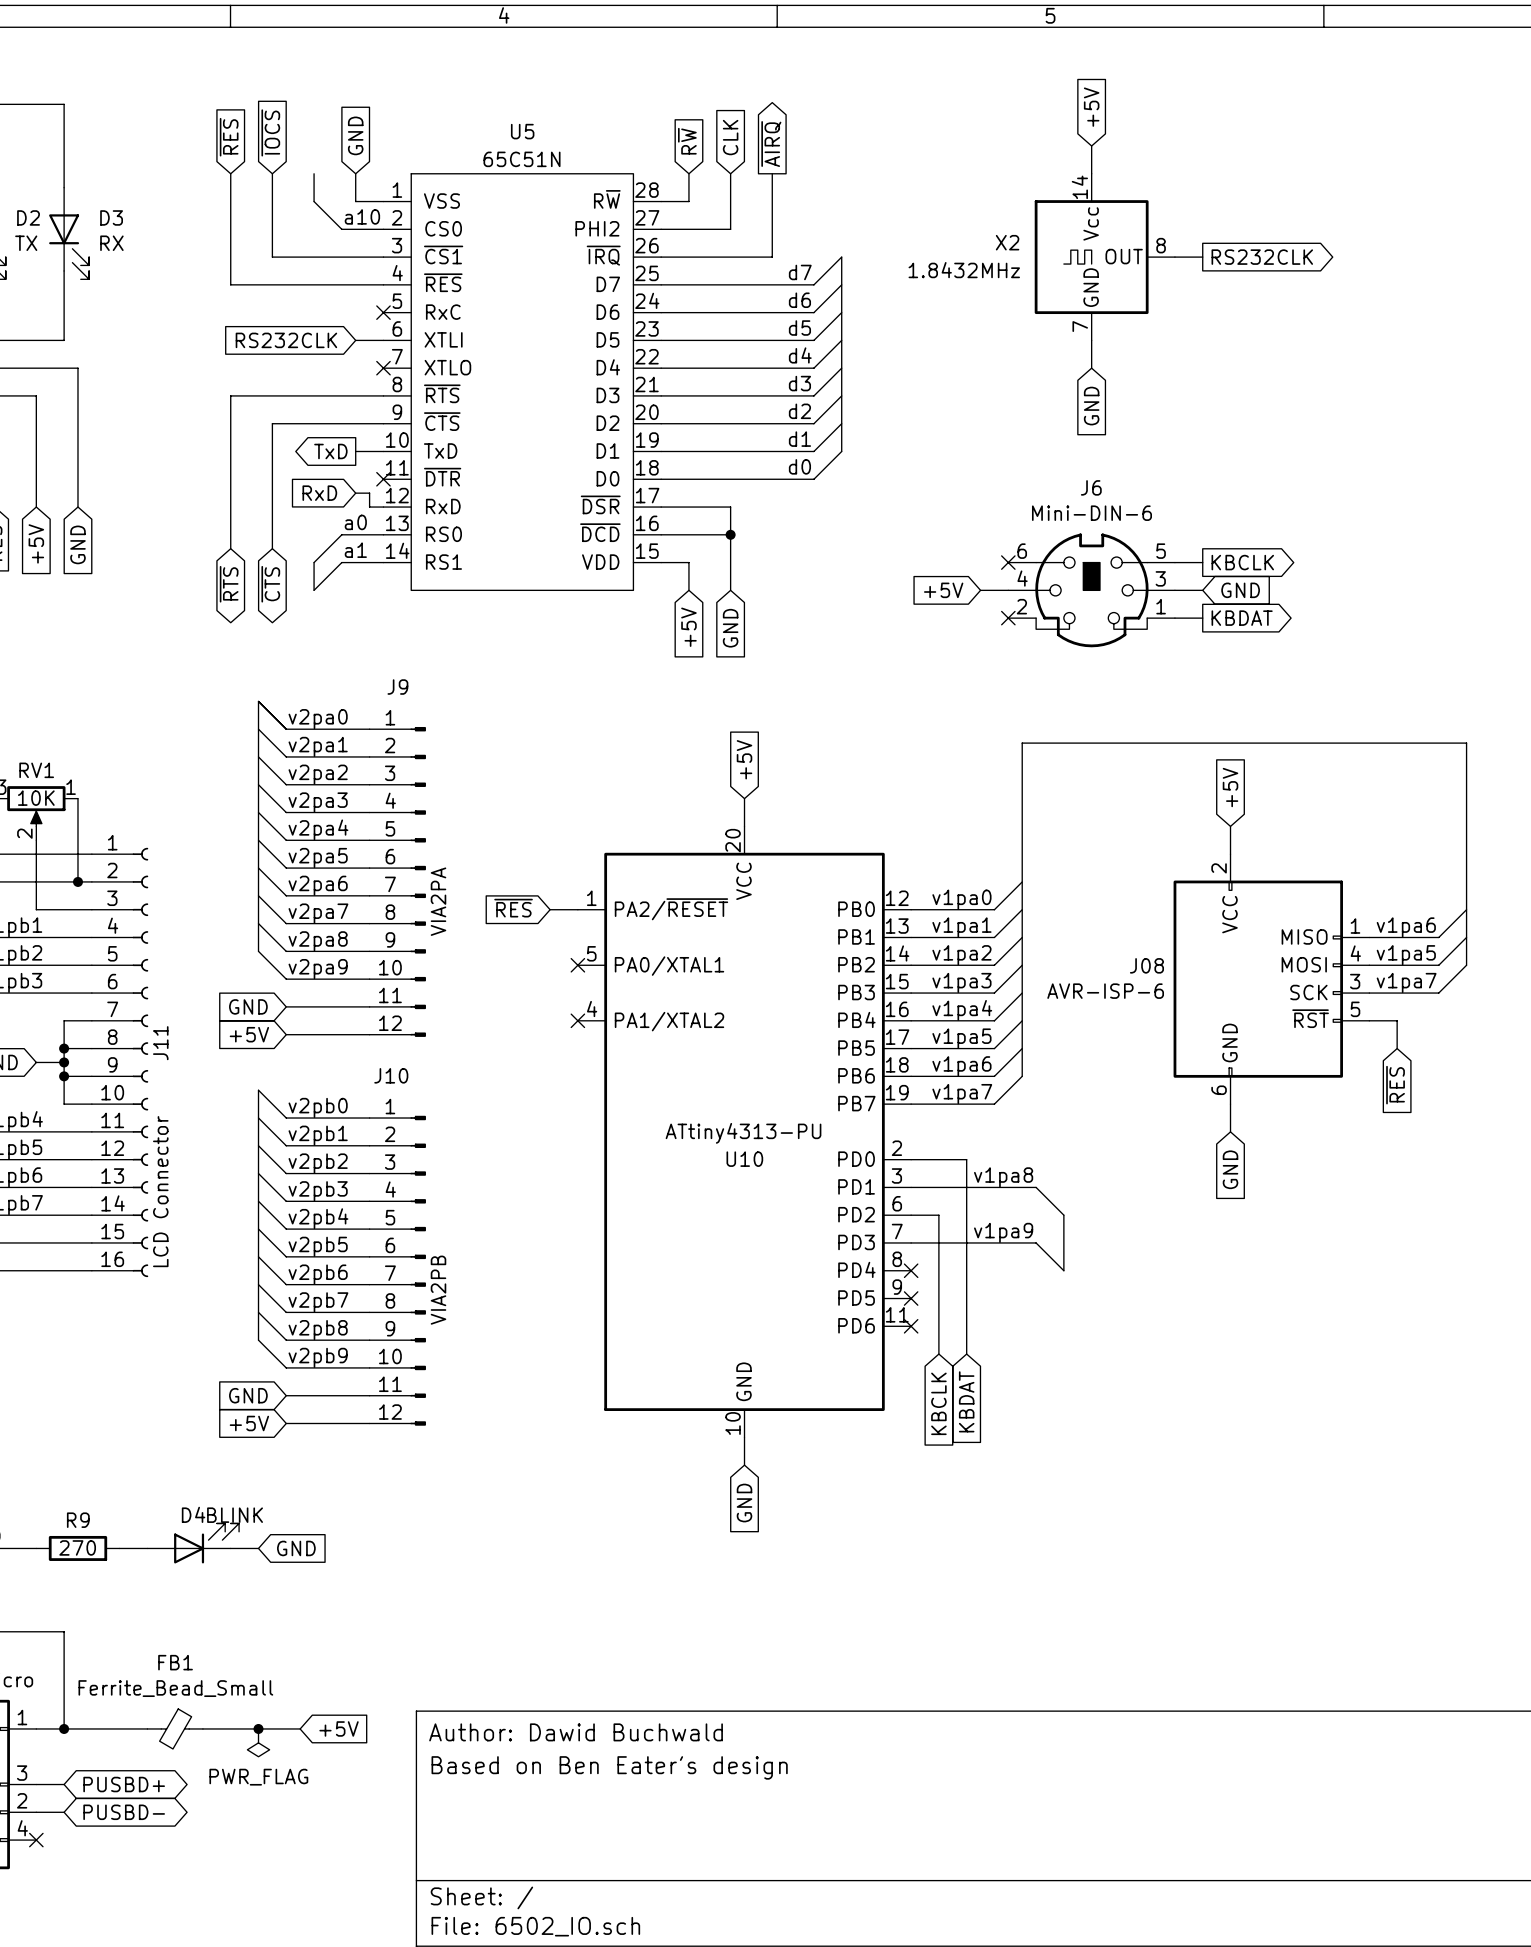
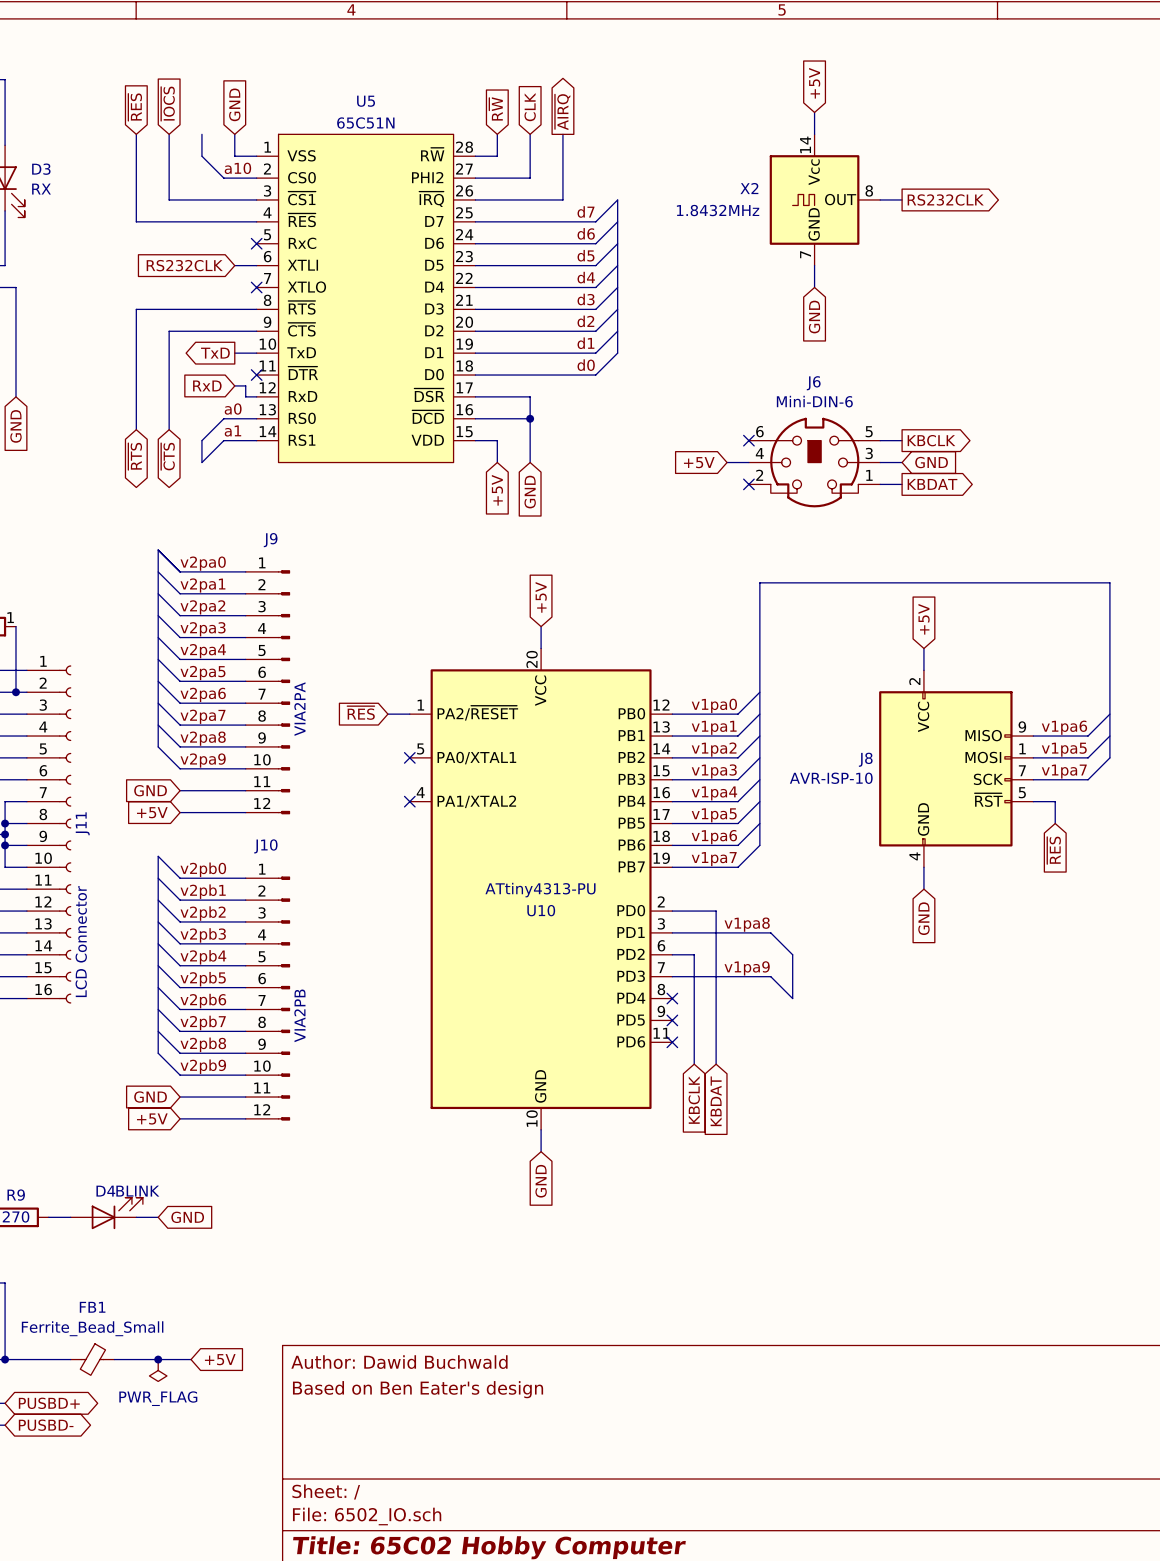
J08 pin number: 1 (1355, 926) -> 9 (1022, 726)
J08 pin number: 4 (1355, 953) -> 1 (1022, 748)
J08 name: J08 (1146, 965) -> J8 (865, 759)
J08 pin number: 3 (1355, 981) -> 7 (1022, 770)
J08 value: AVR-ISP-6 (1105, 991) -> AVR-ISP-10 (831, 778)
J08 pin number: 6 (1219, 1090) -> 4 (914, 856)

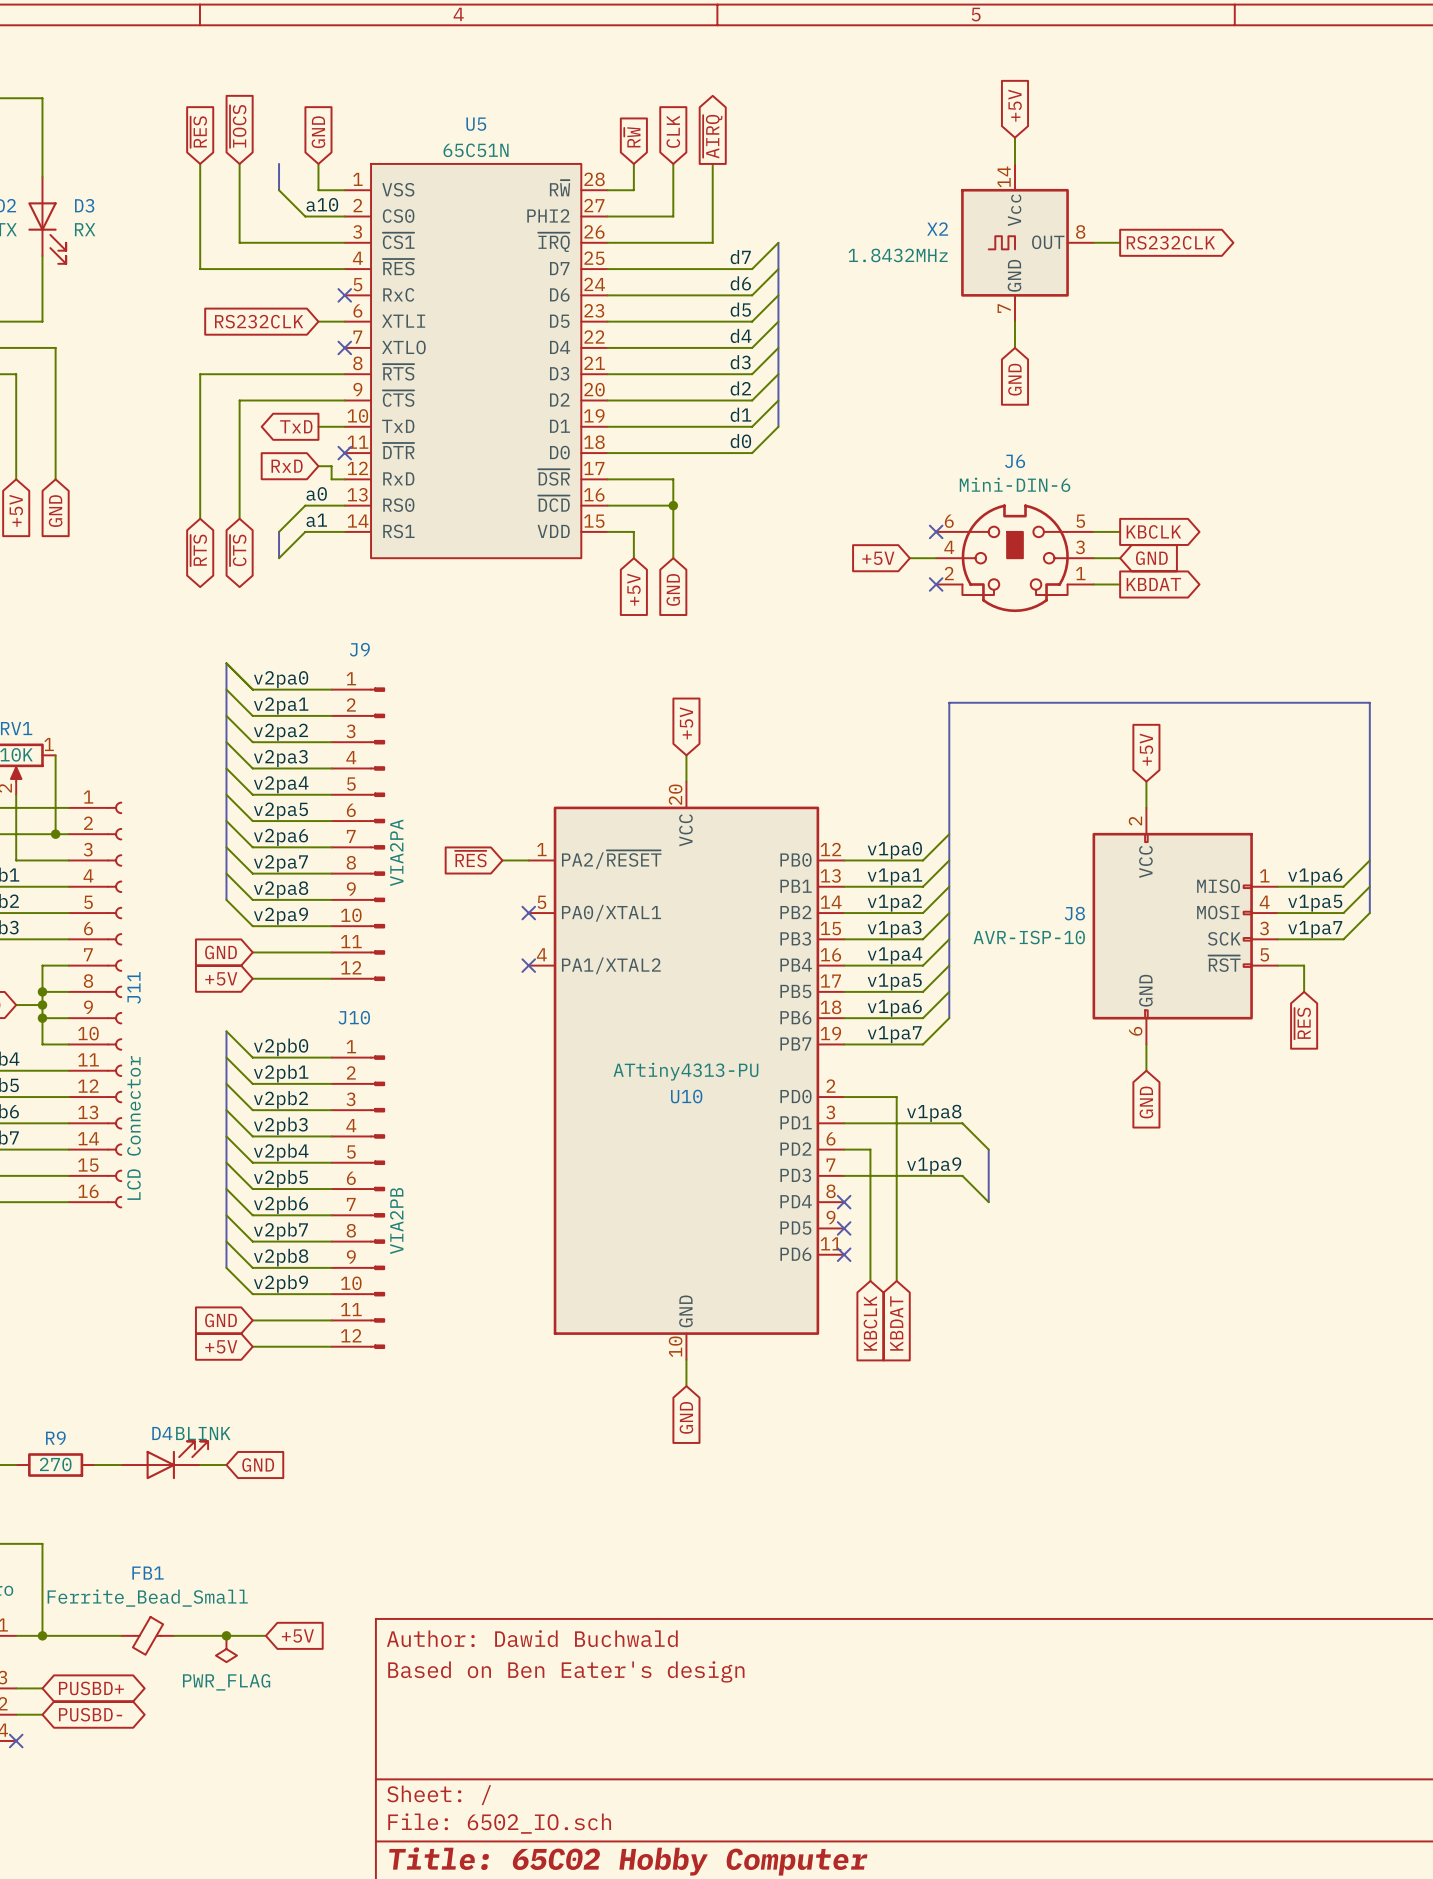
J8 pin number: 9 (1022, 726) -> 1 (1264, 875)
J8 pin number: 1 (1022, 748) -> 4 (1264, 902)
J8 pin number: 7 (1022, 770) -> 3 (1264, 928)
J8 pin number: 4 (914, 856) -> 6 (1135, 1031)

